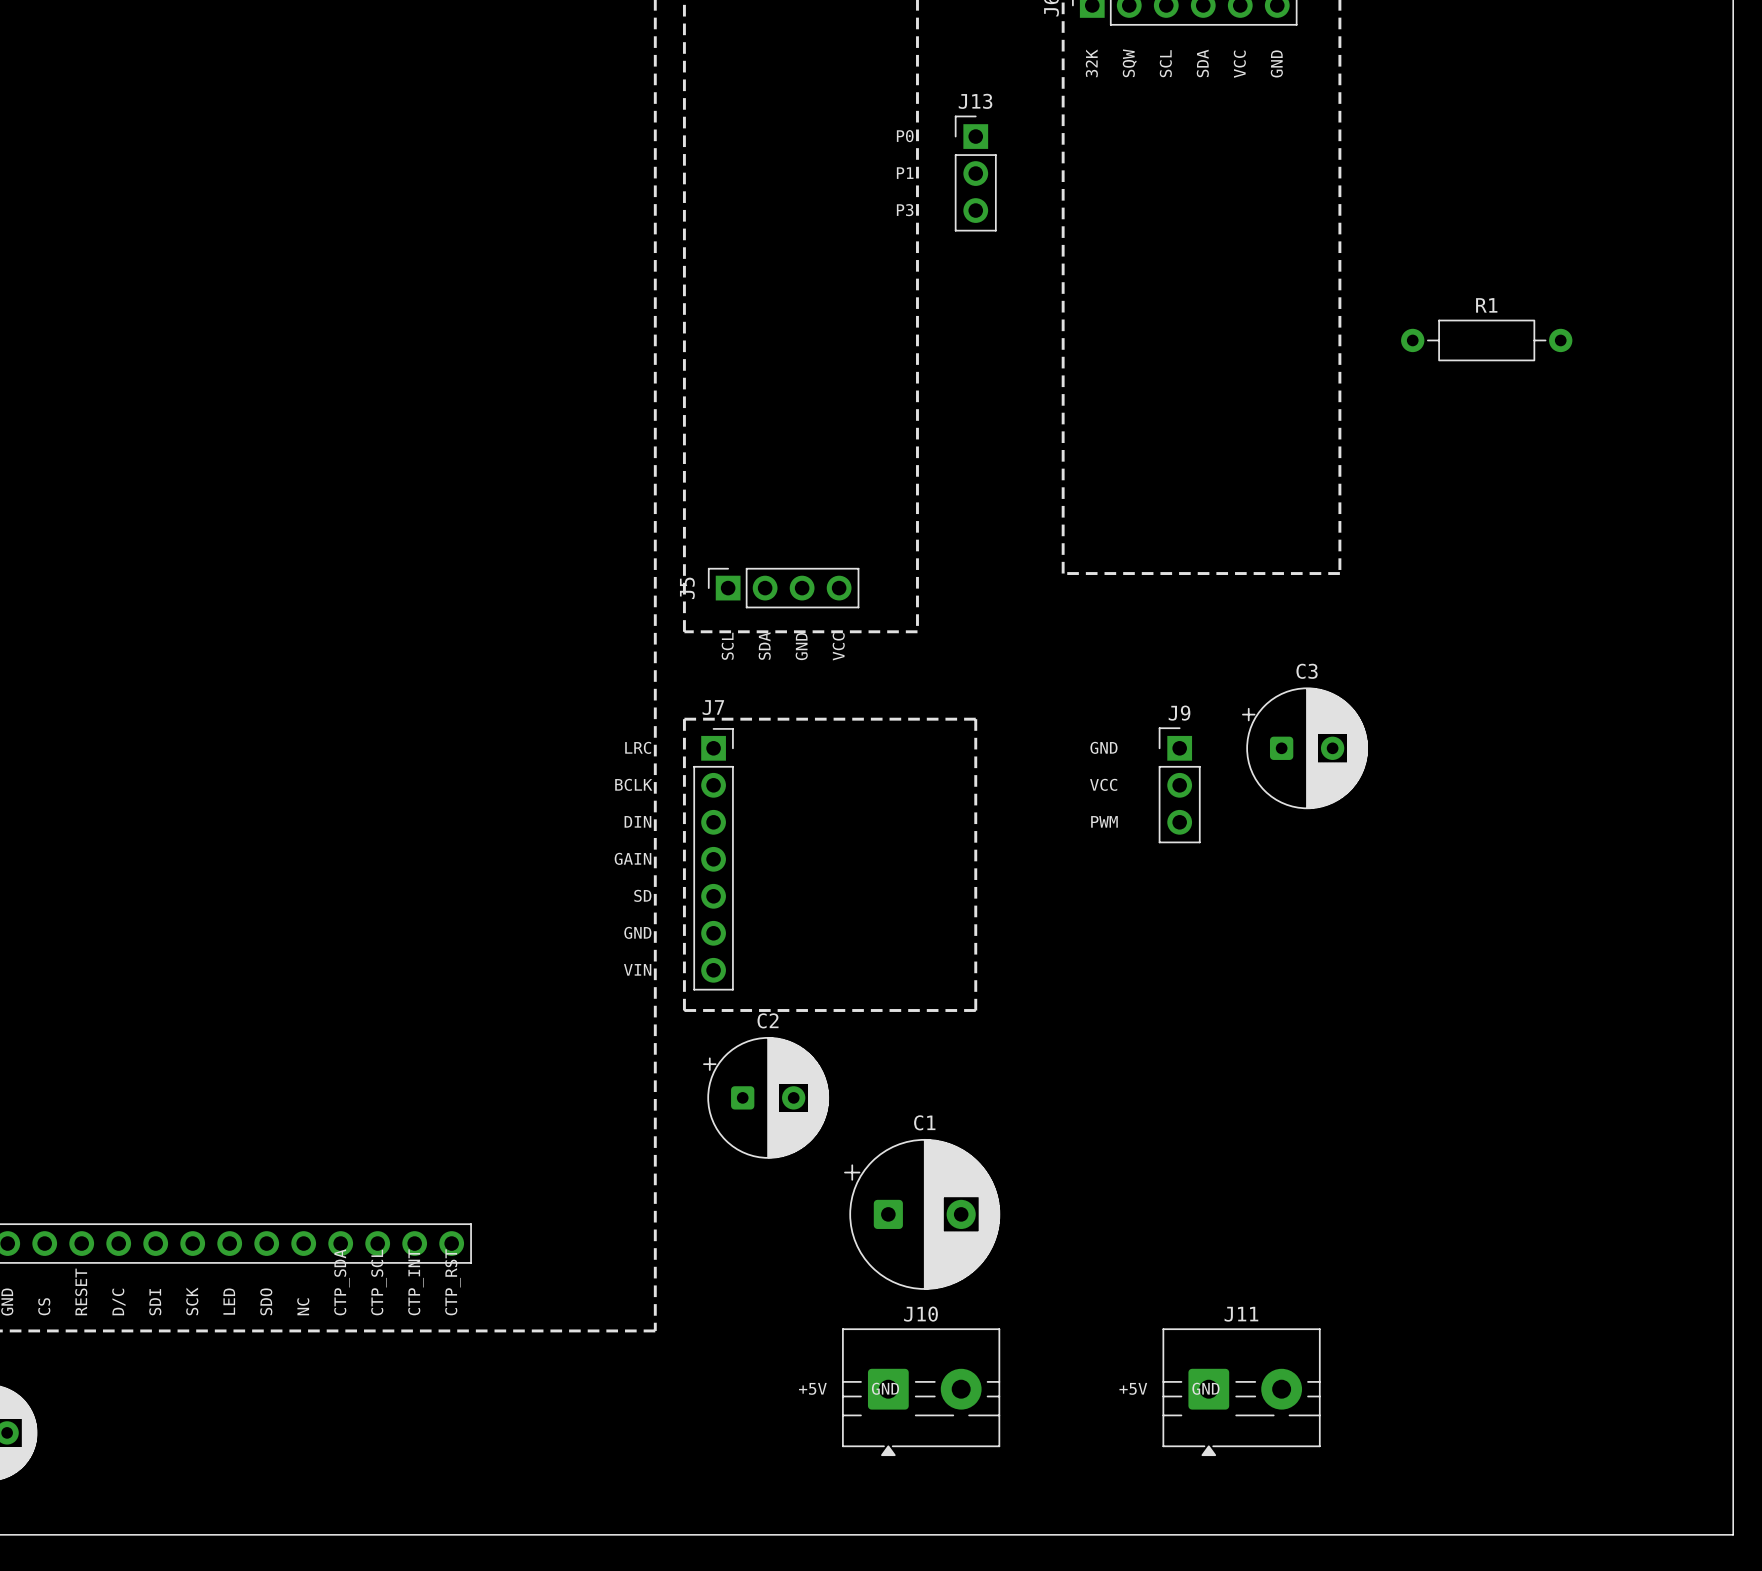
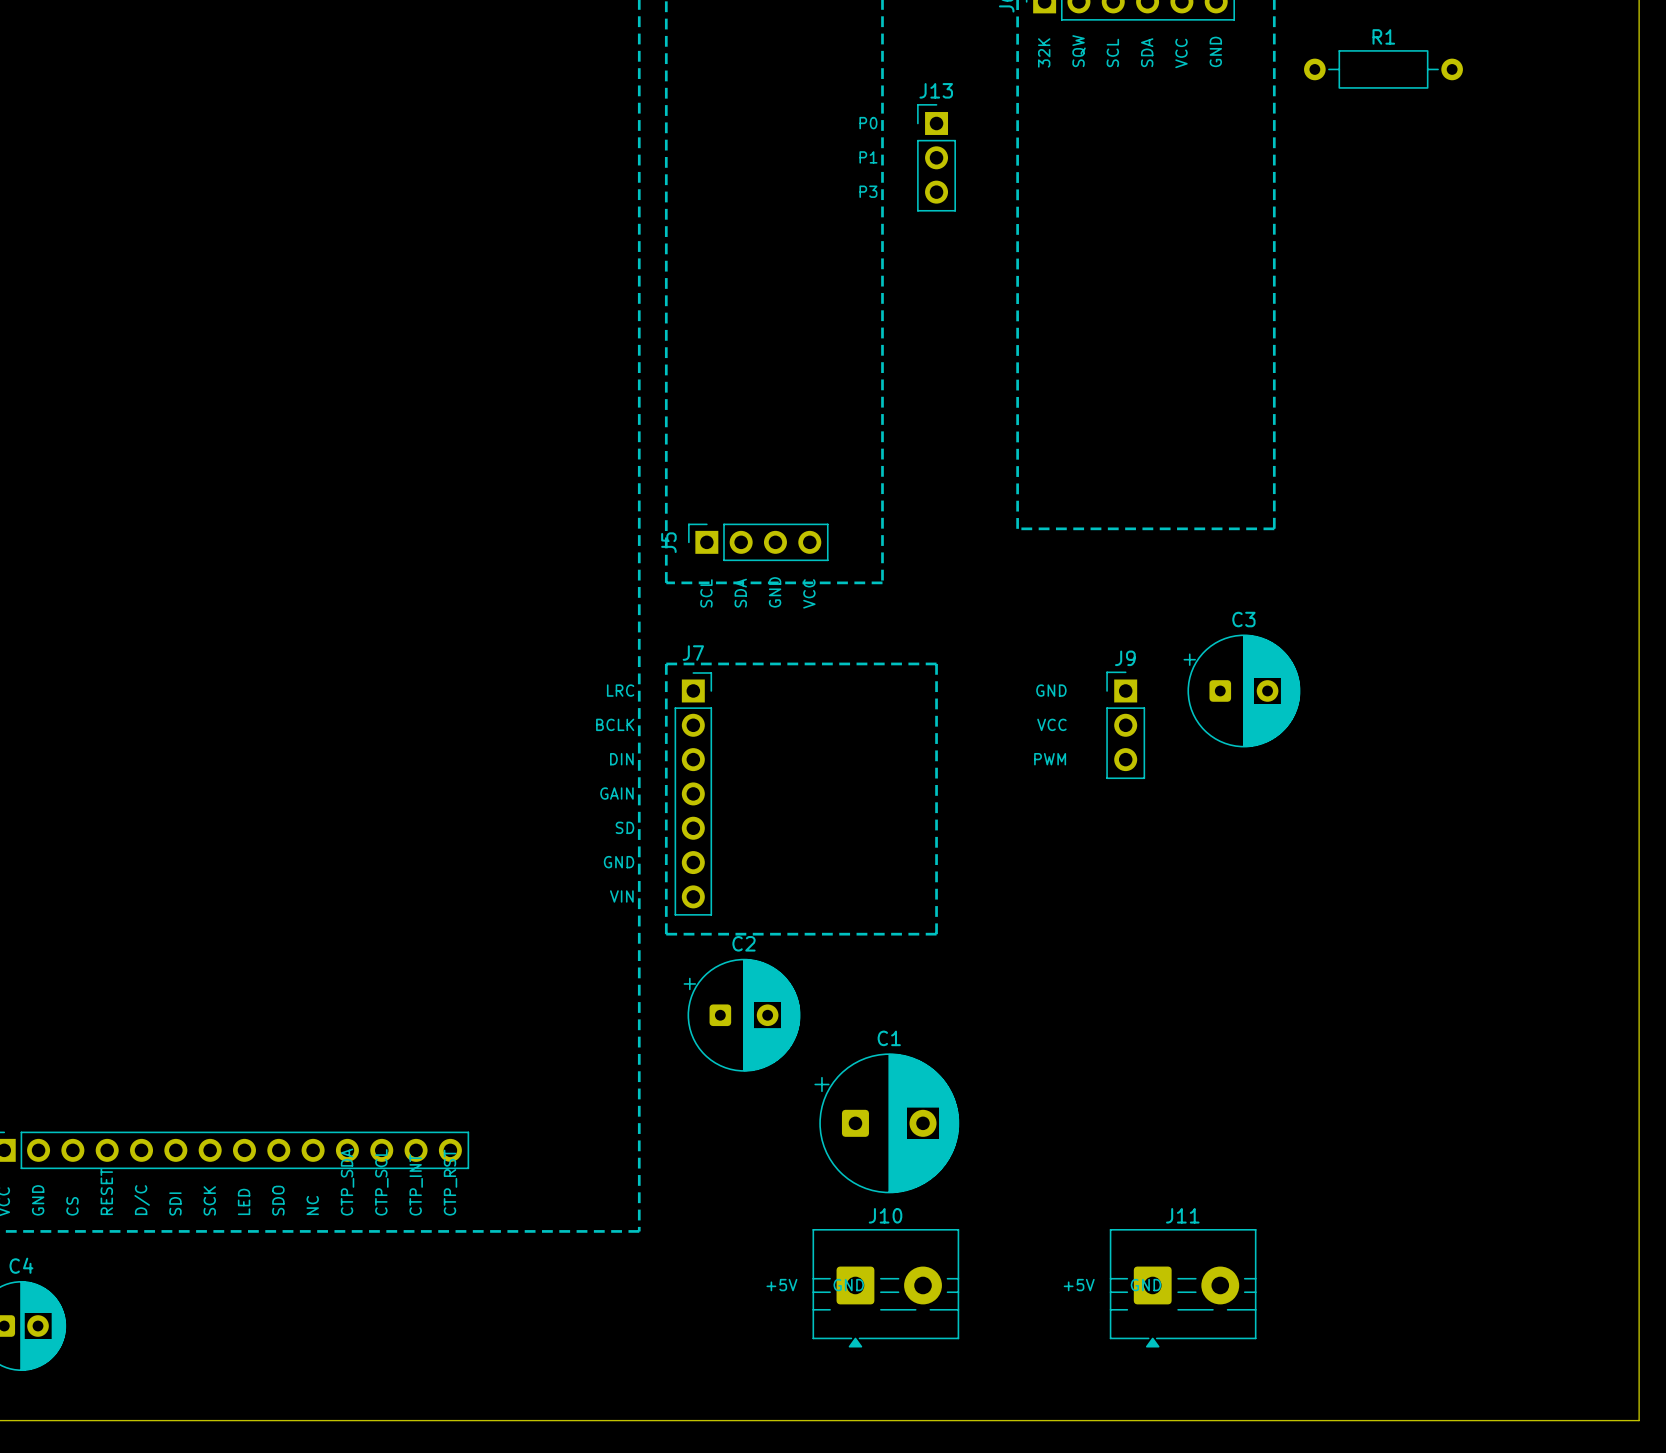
R1 position: (1486, 340) -> (1383, 69)

